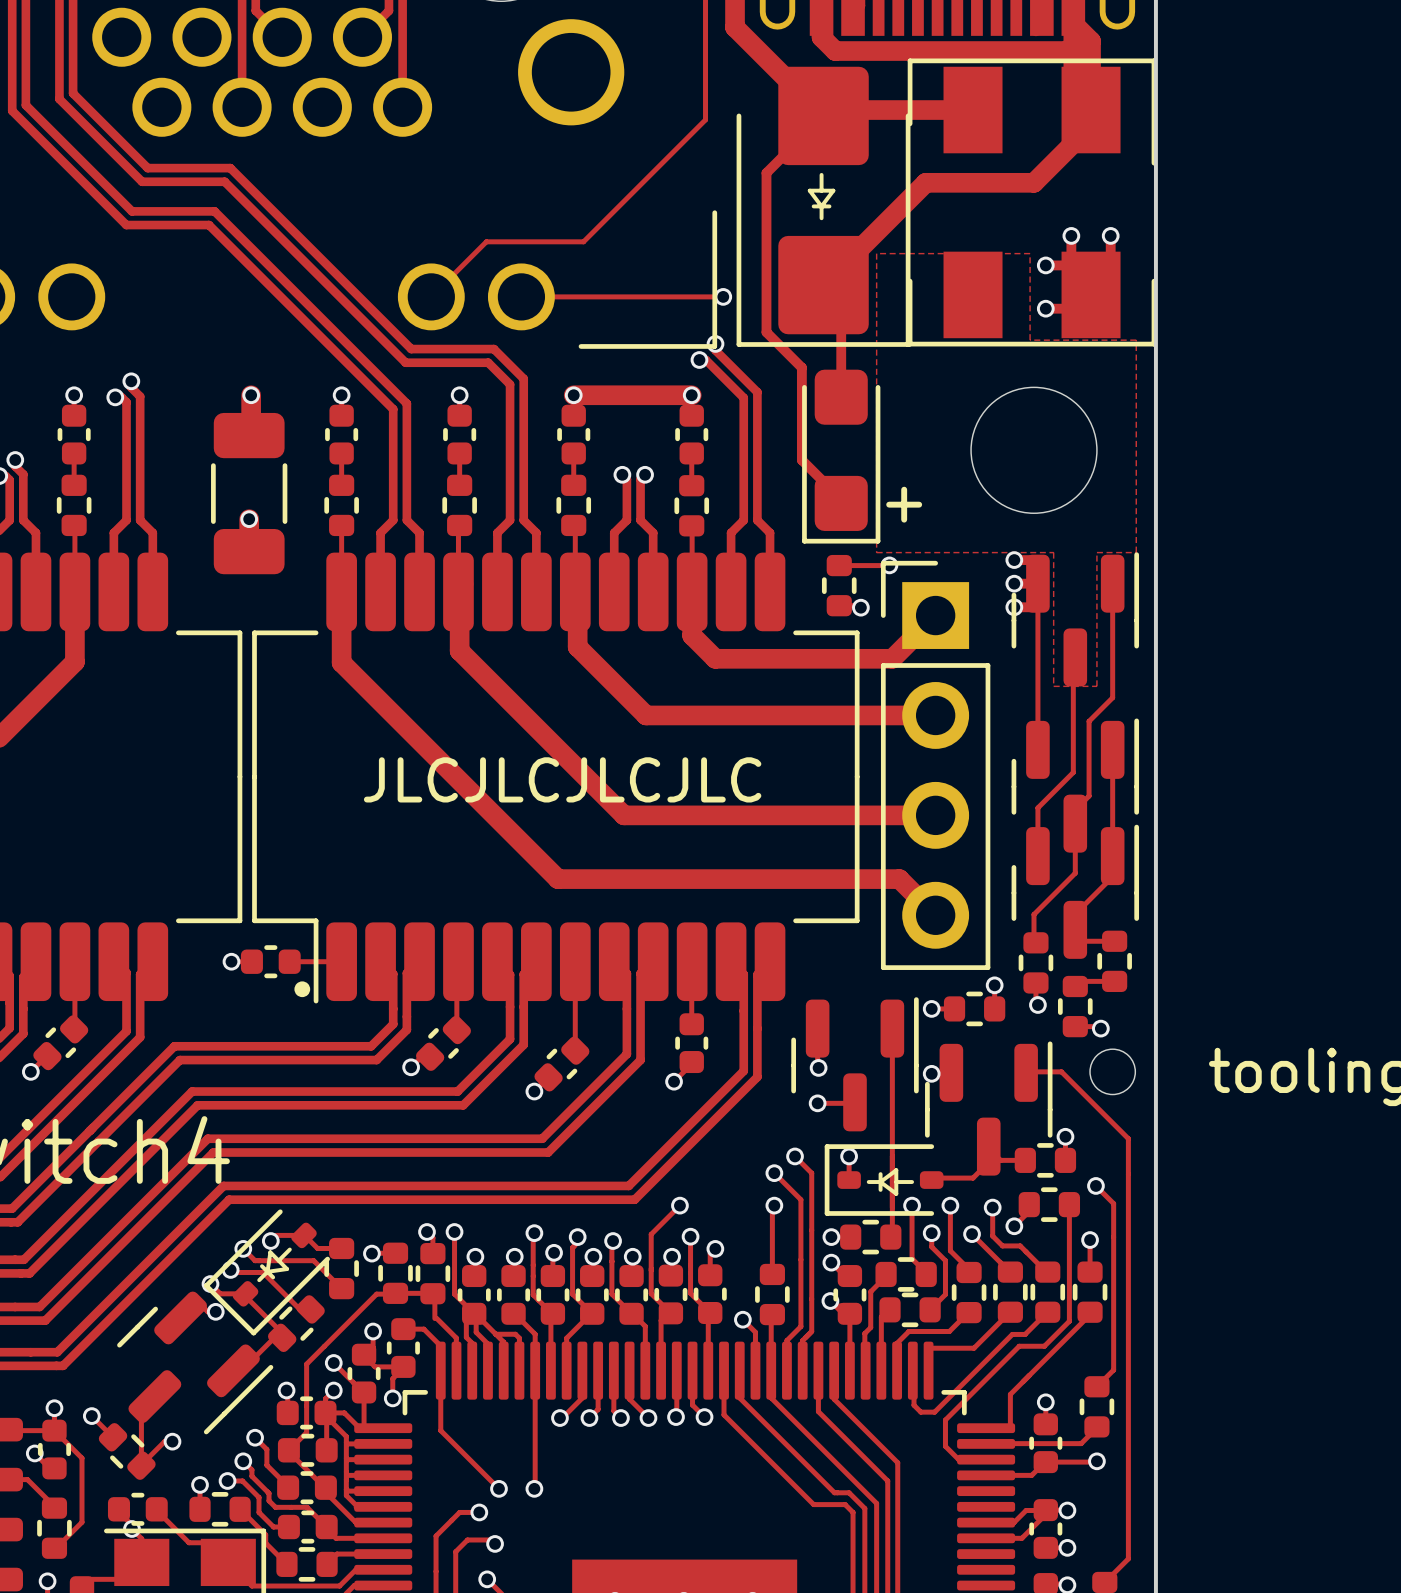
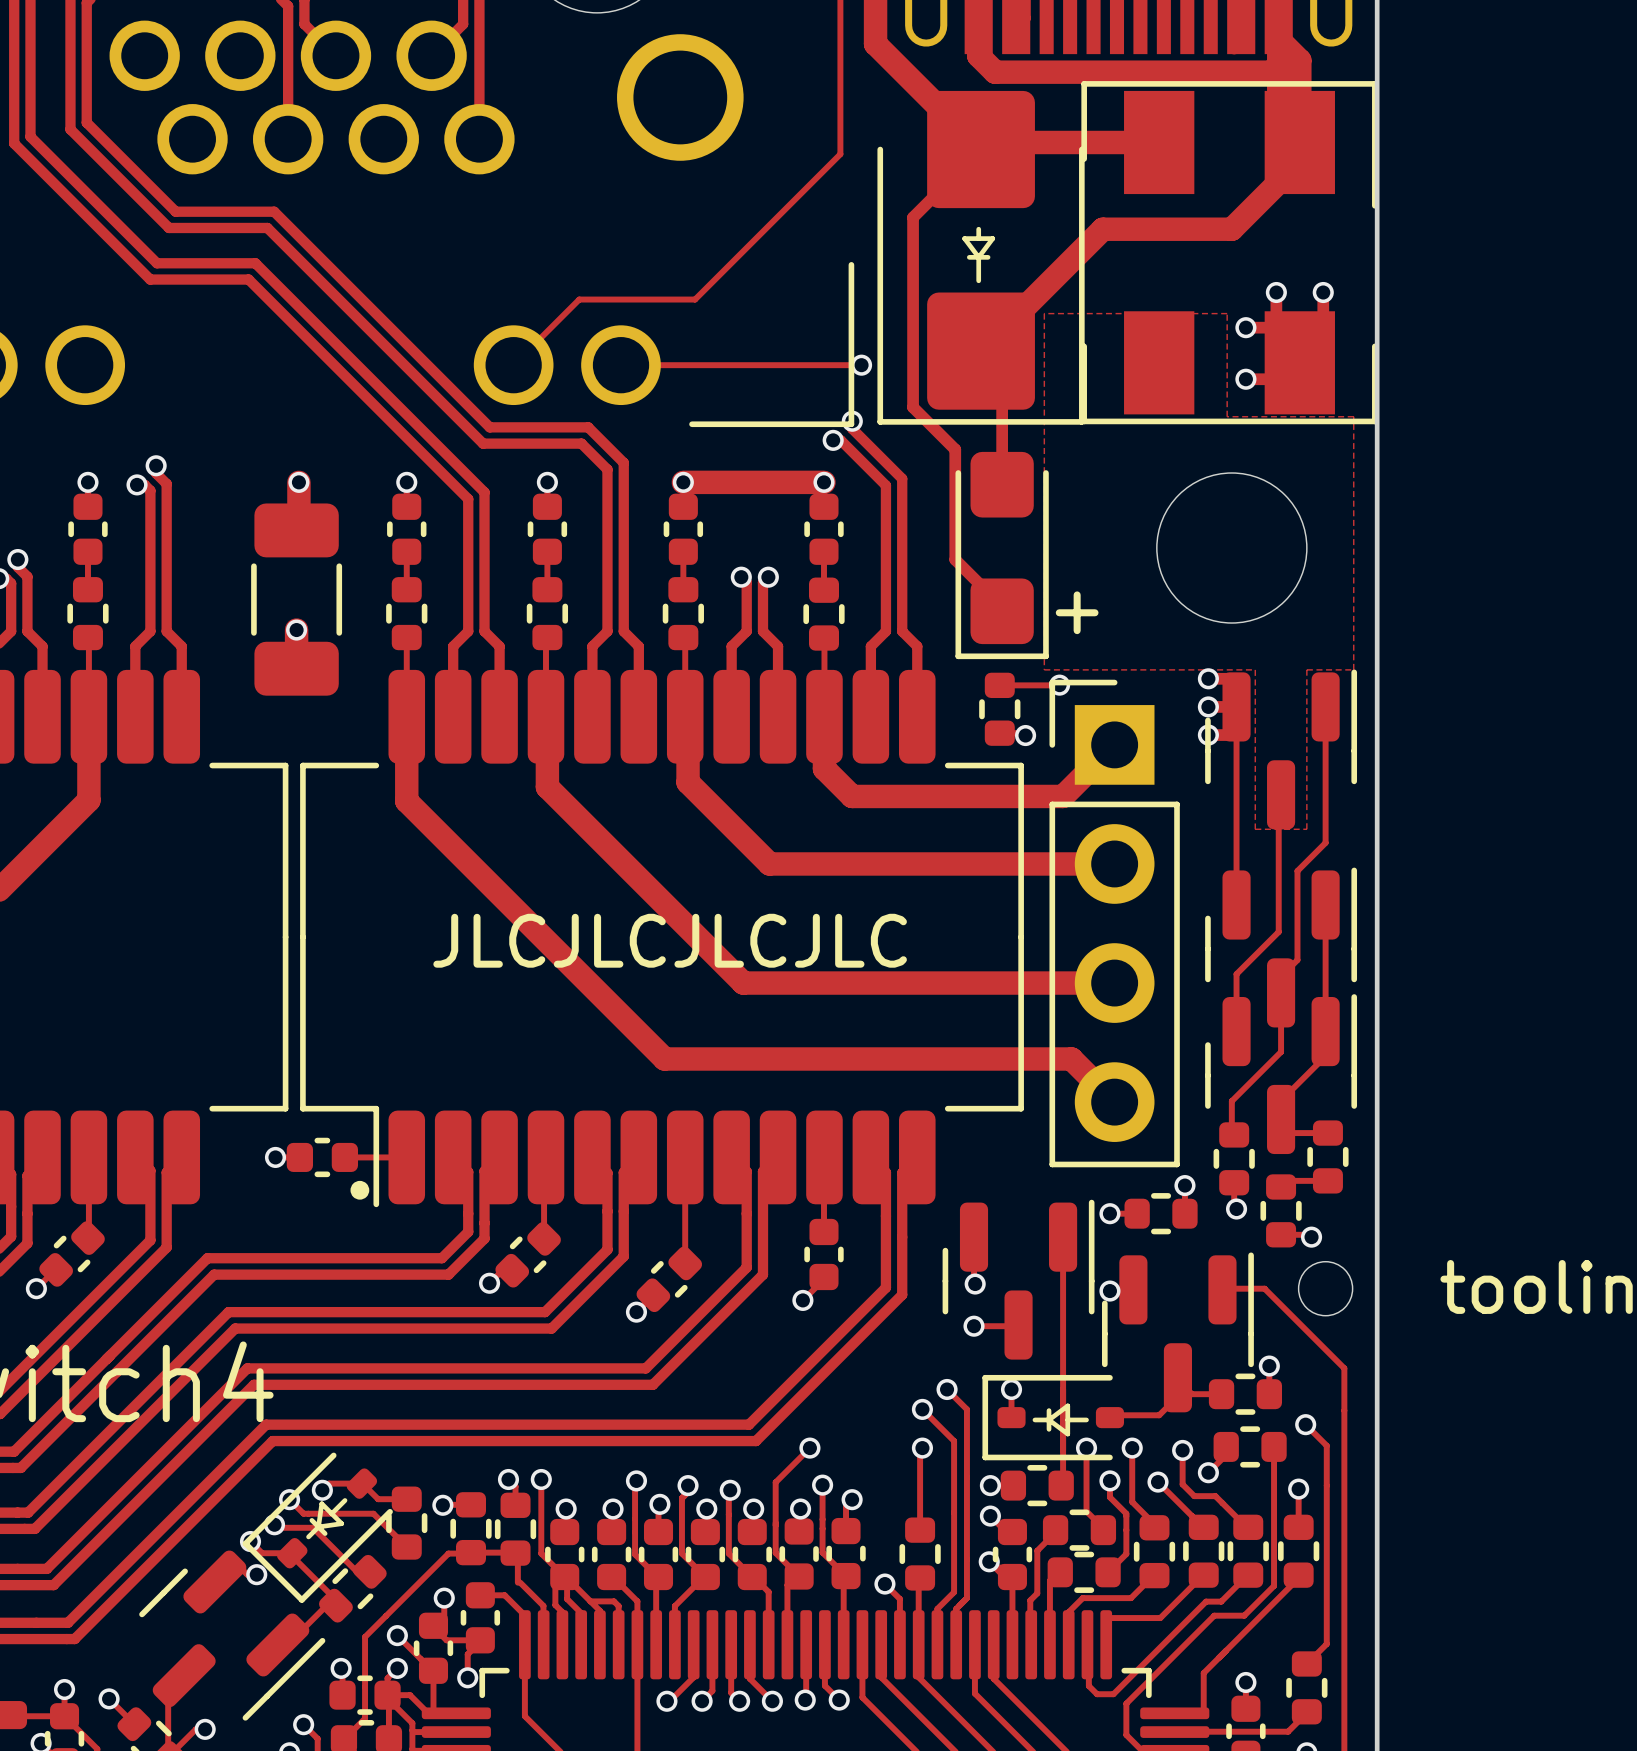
line: (821, 174) (821, 182) -> (978, 271) (978, 280)

